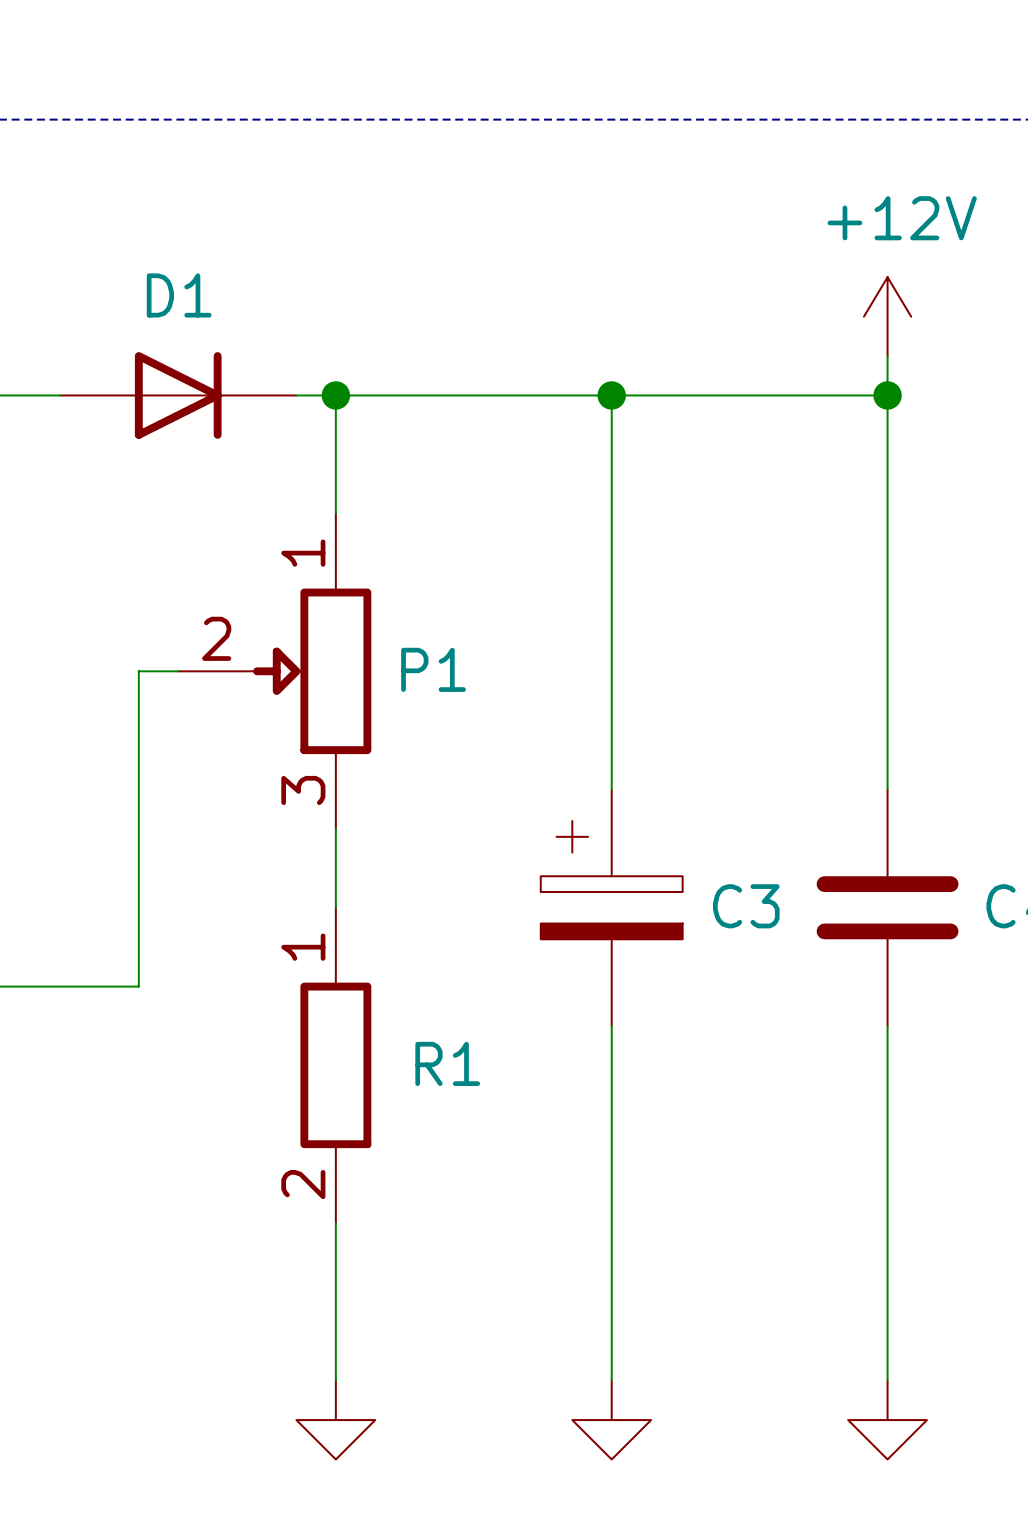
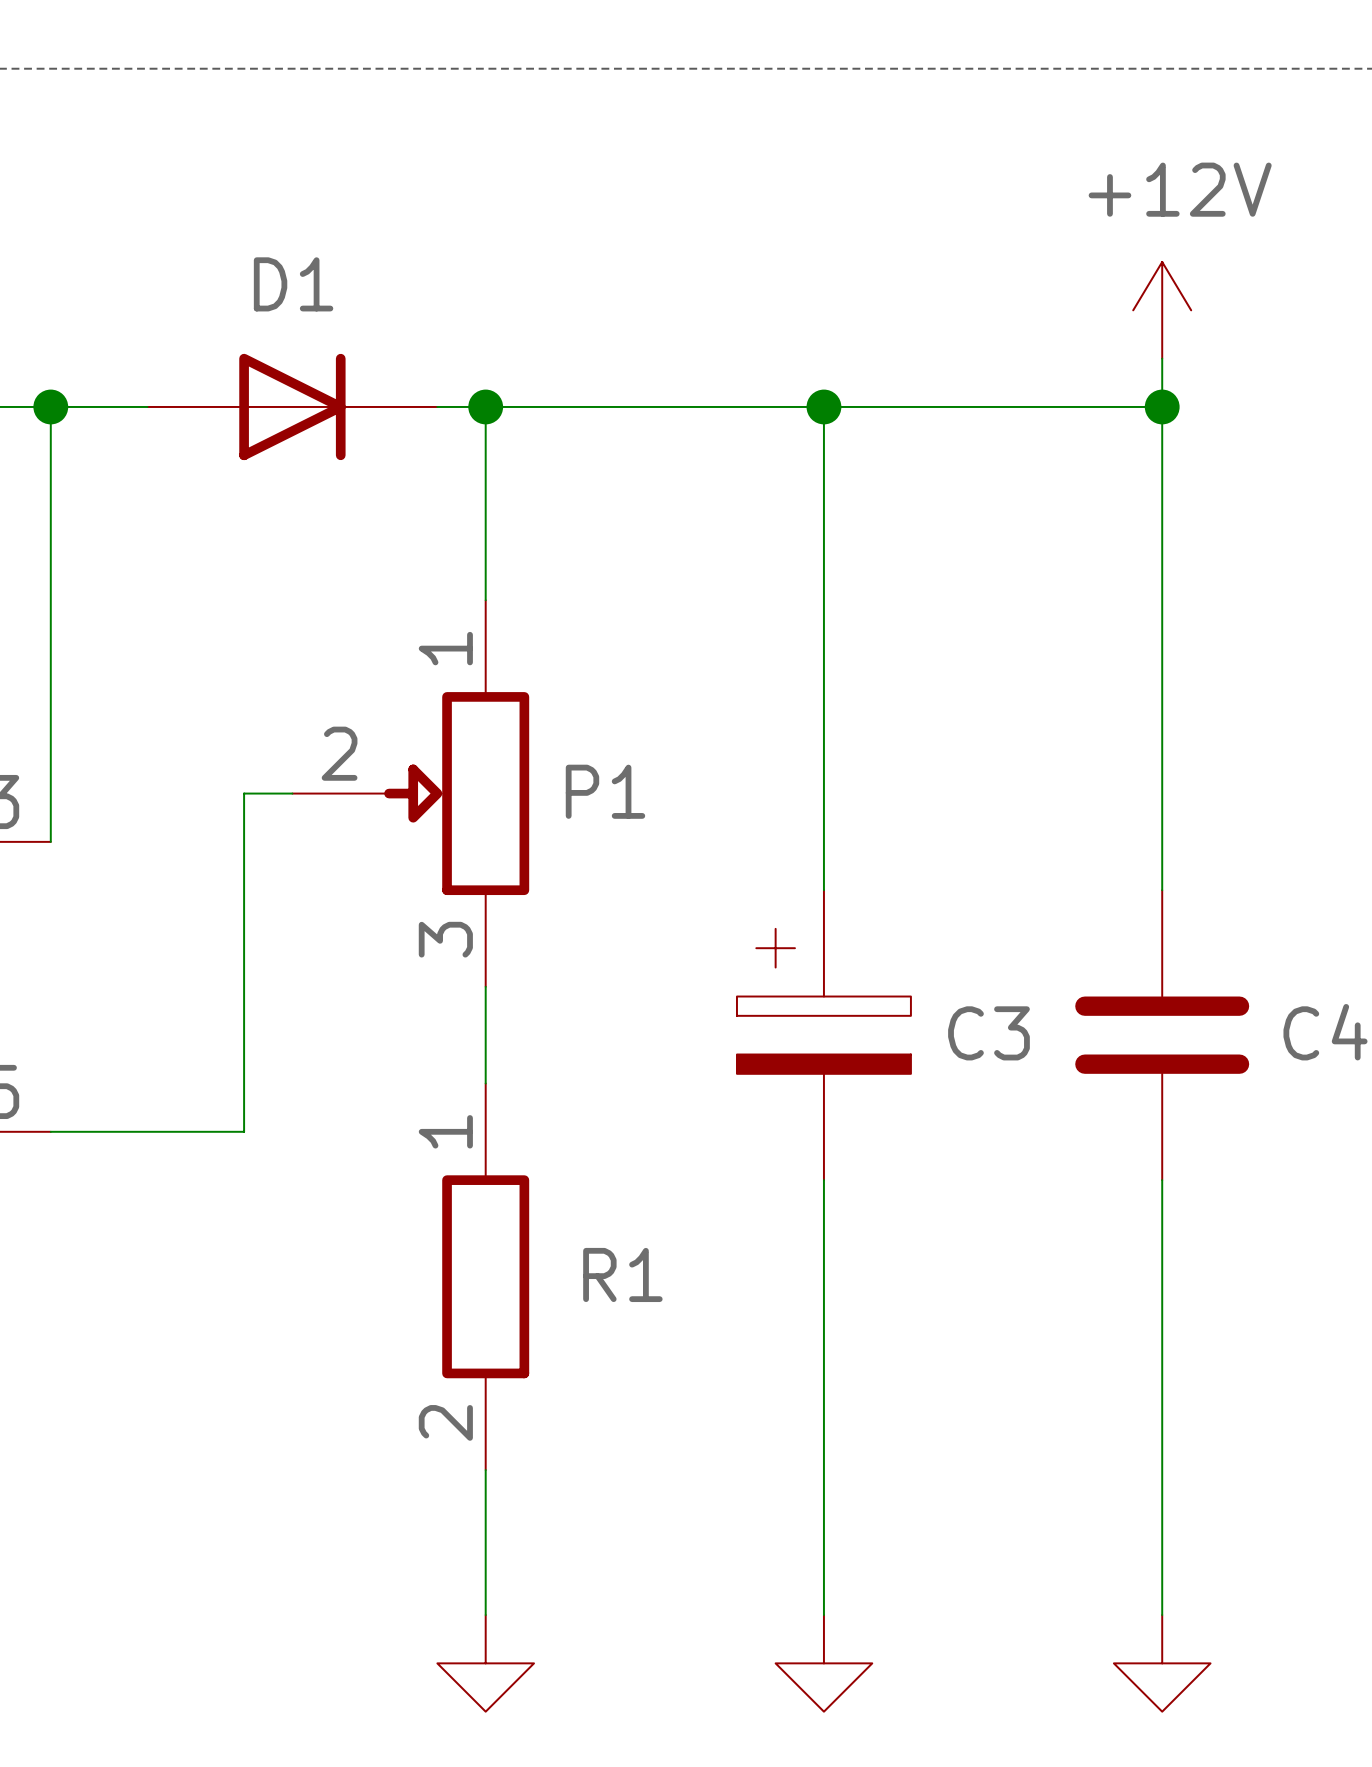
wire: (178, 671) (138, 671) (138, 710) -> (292, 793) (244, 793)
P1 position: (274, 671) -> (410, 793)
R1 position: (335, 1065) -> (485, 1276)

